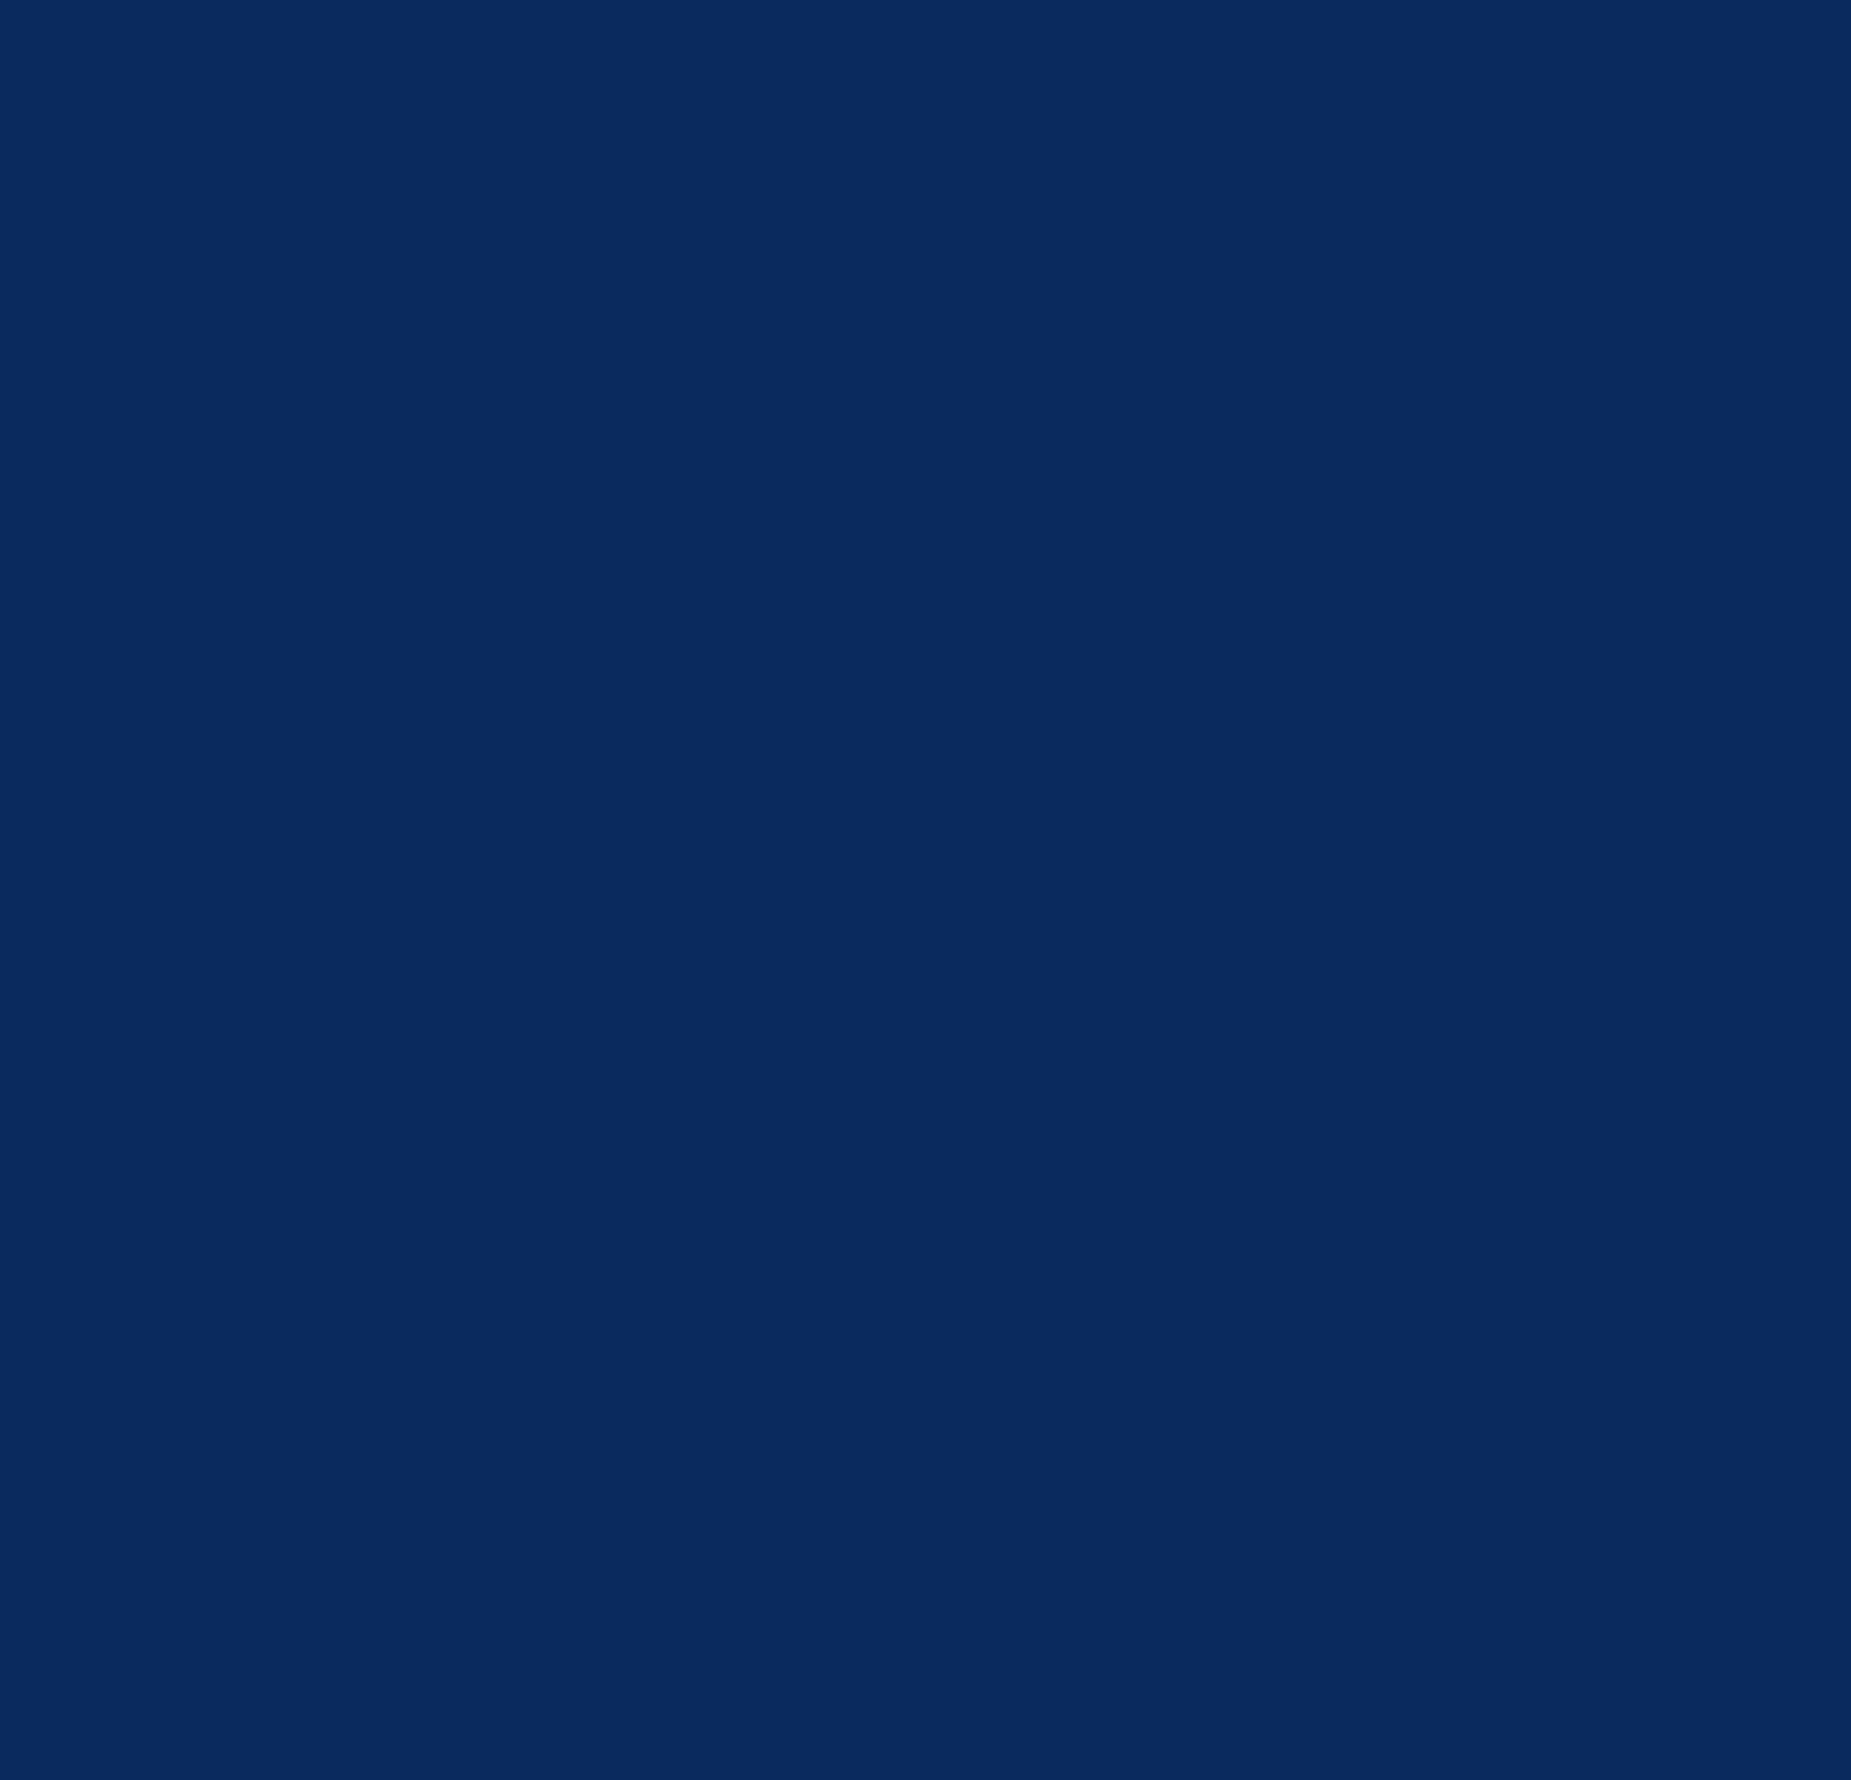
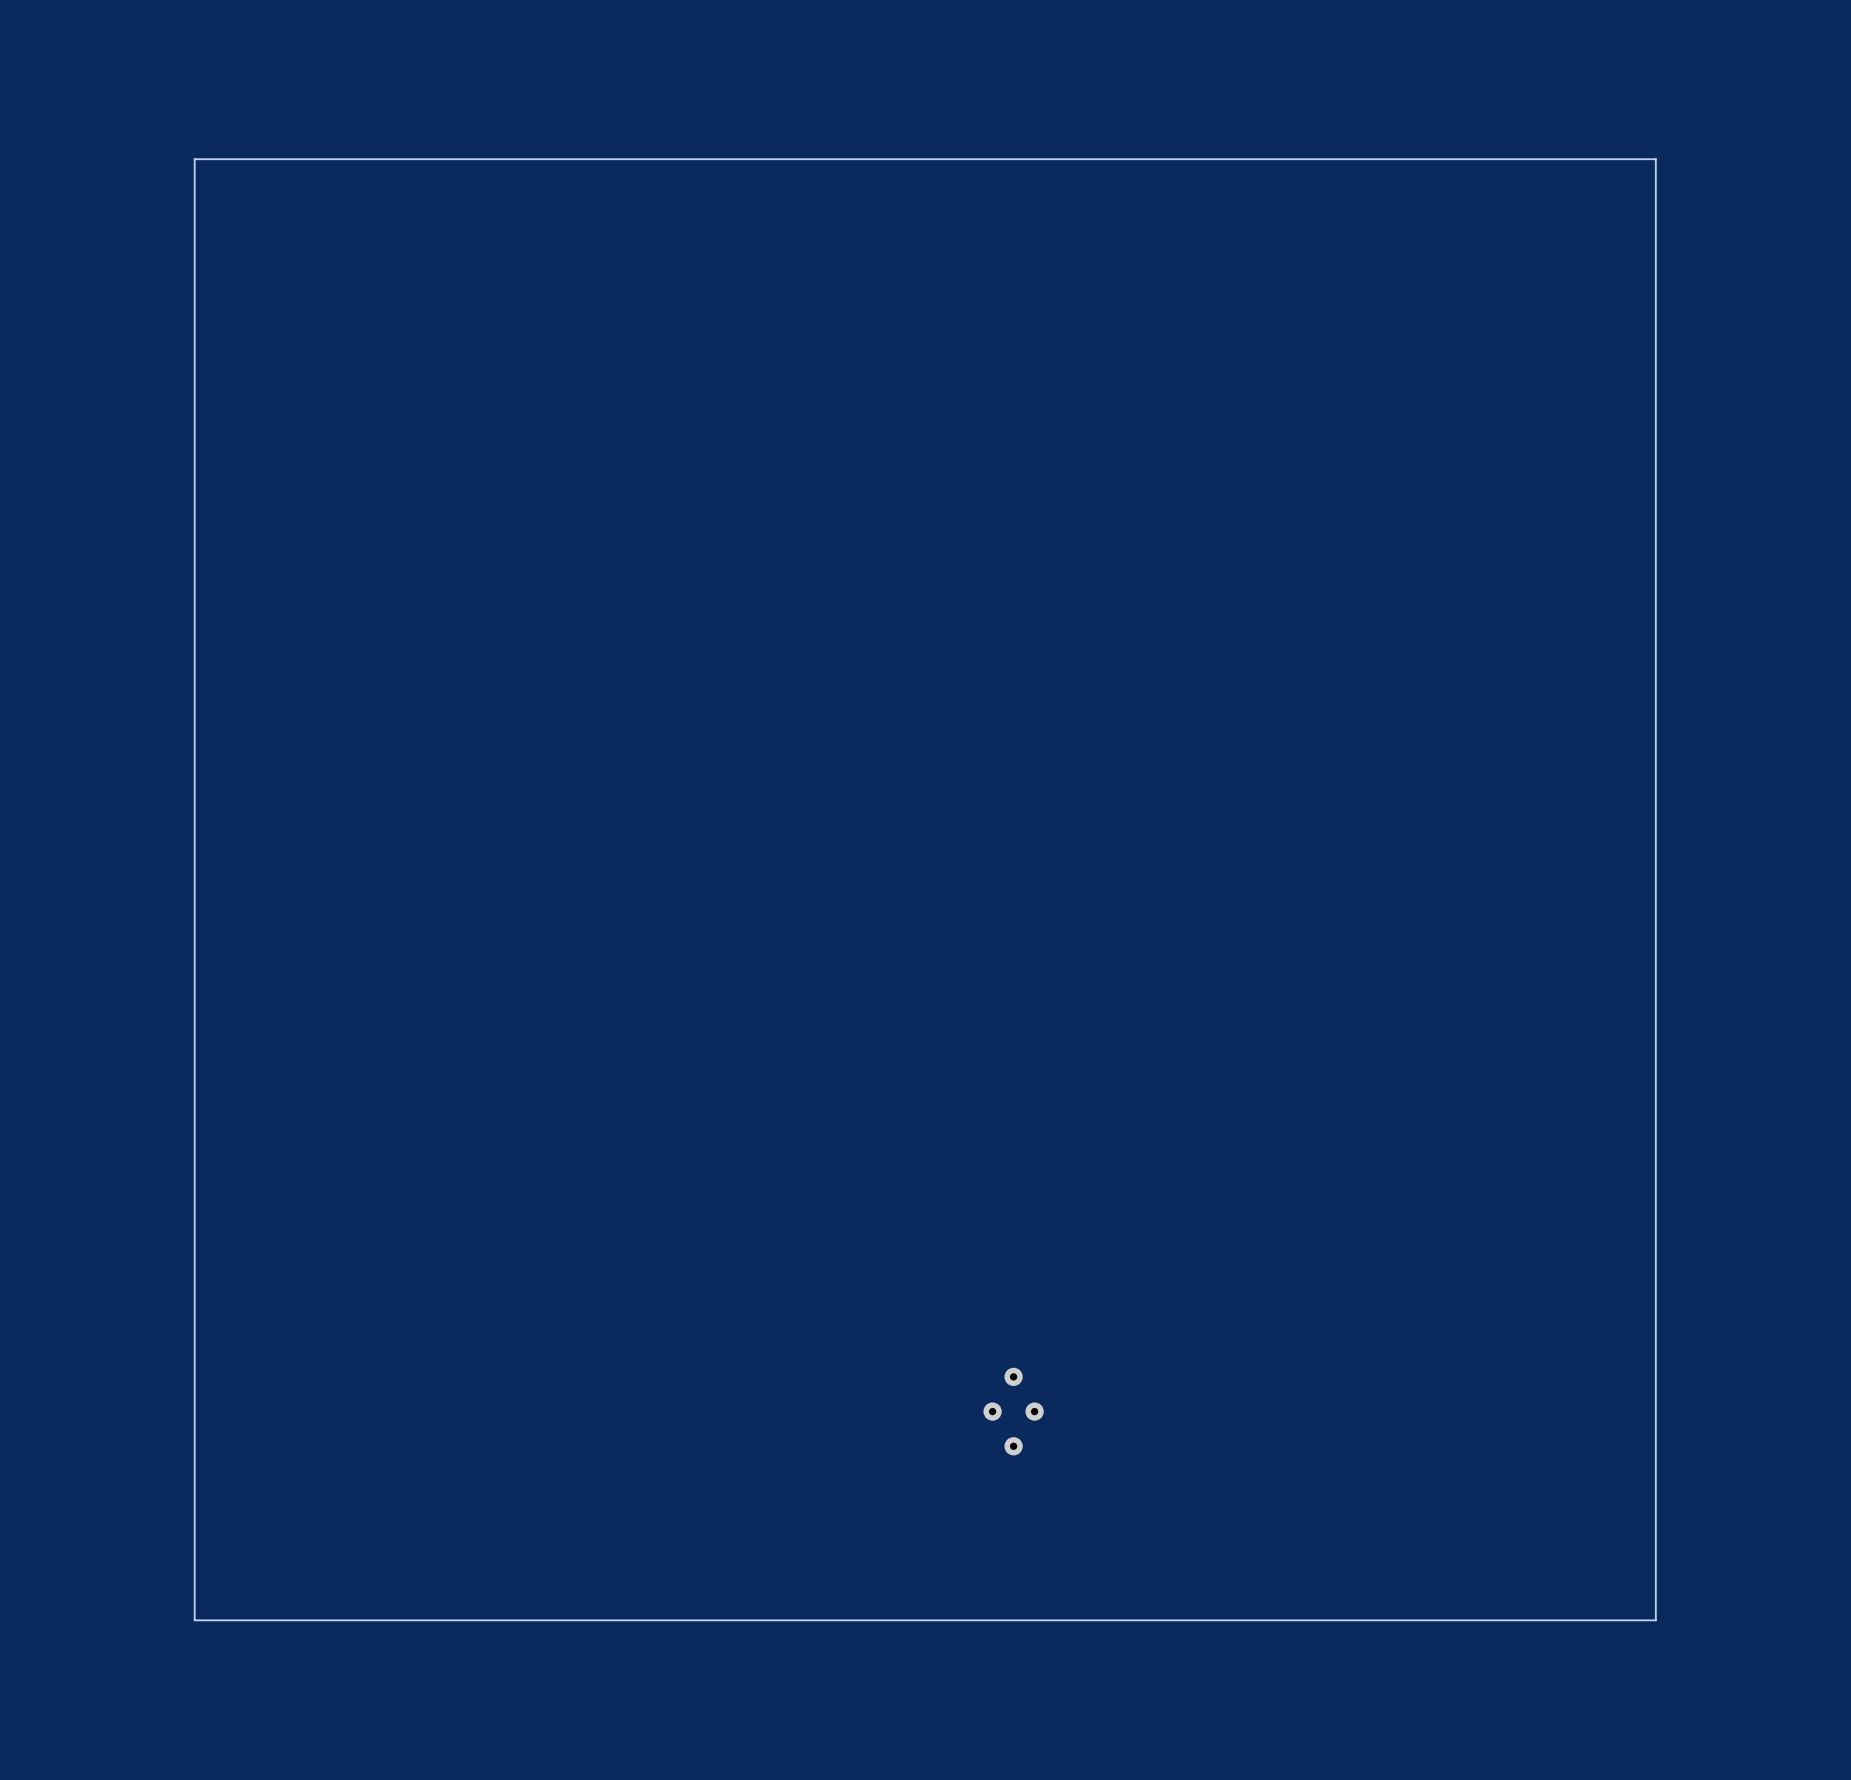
board edge: none -> (1655, 159) (194, 159) (194, 1620) (1655, 1620) (1655, 159)
part: none -> (1013, 1411)

